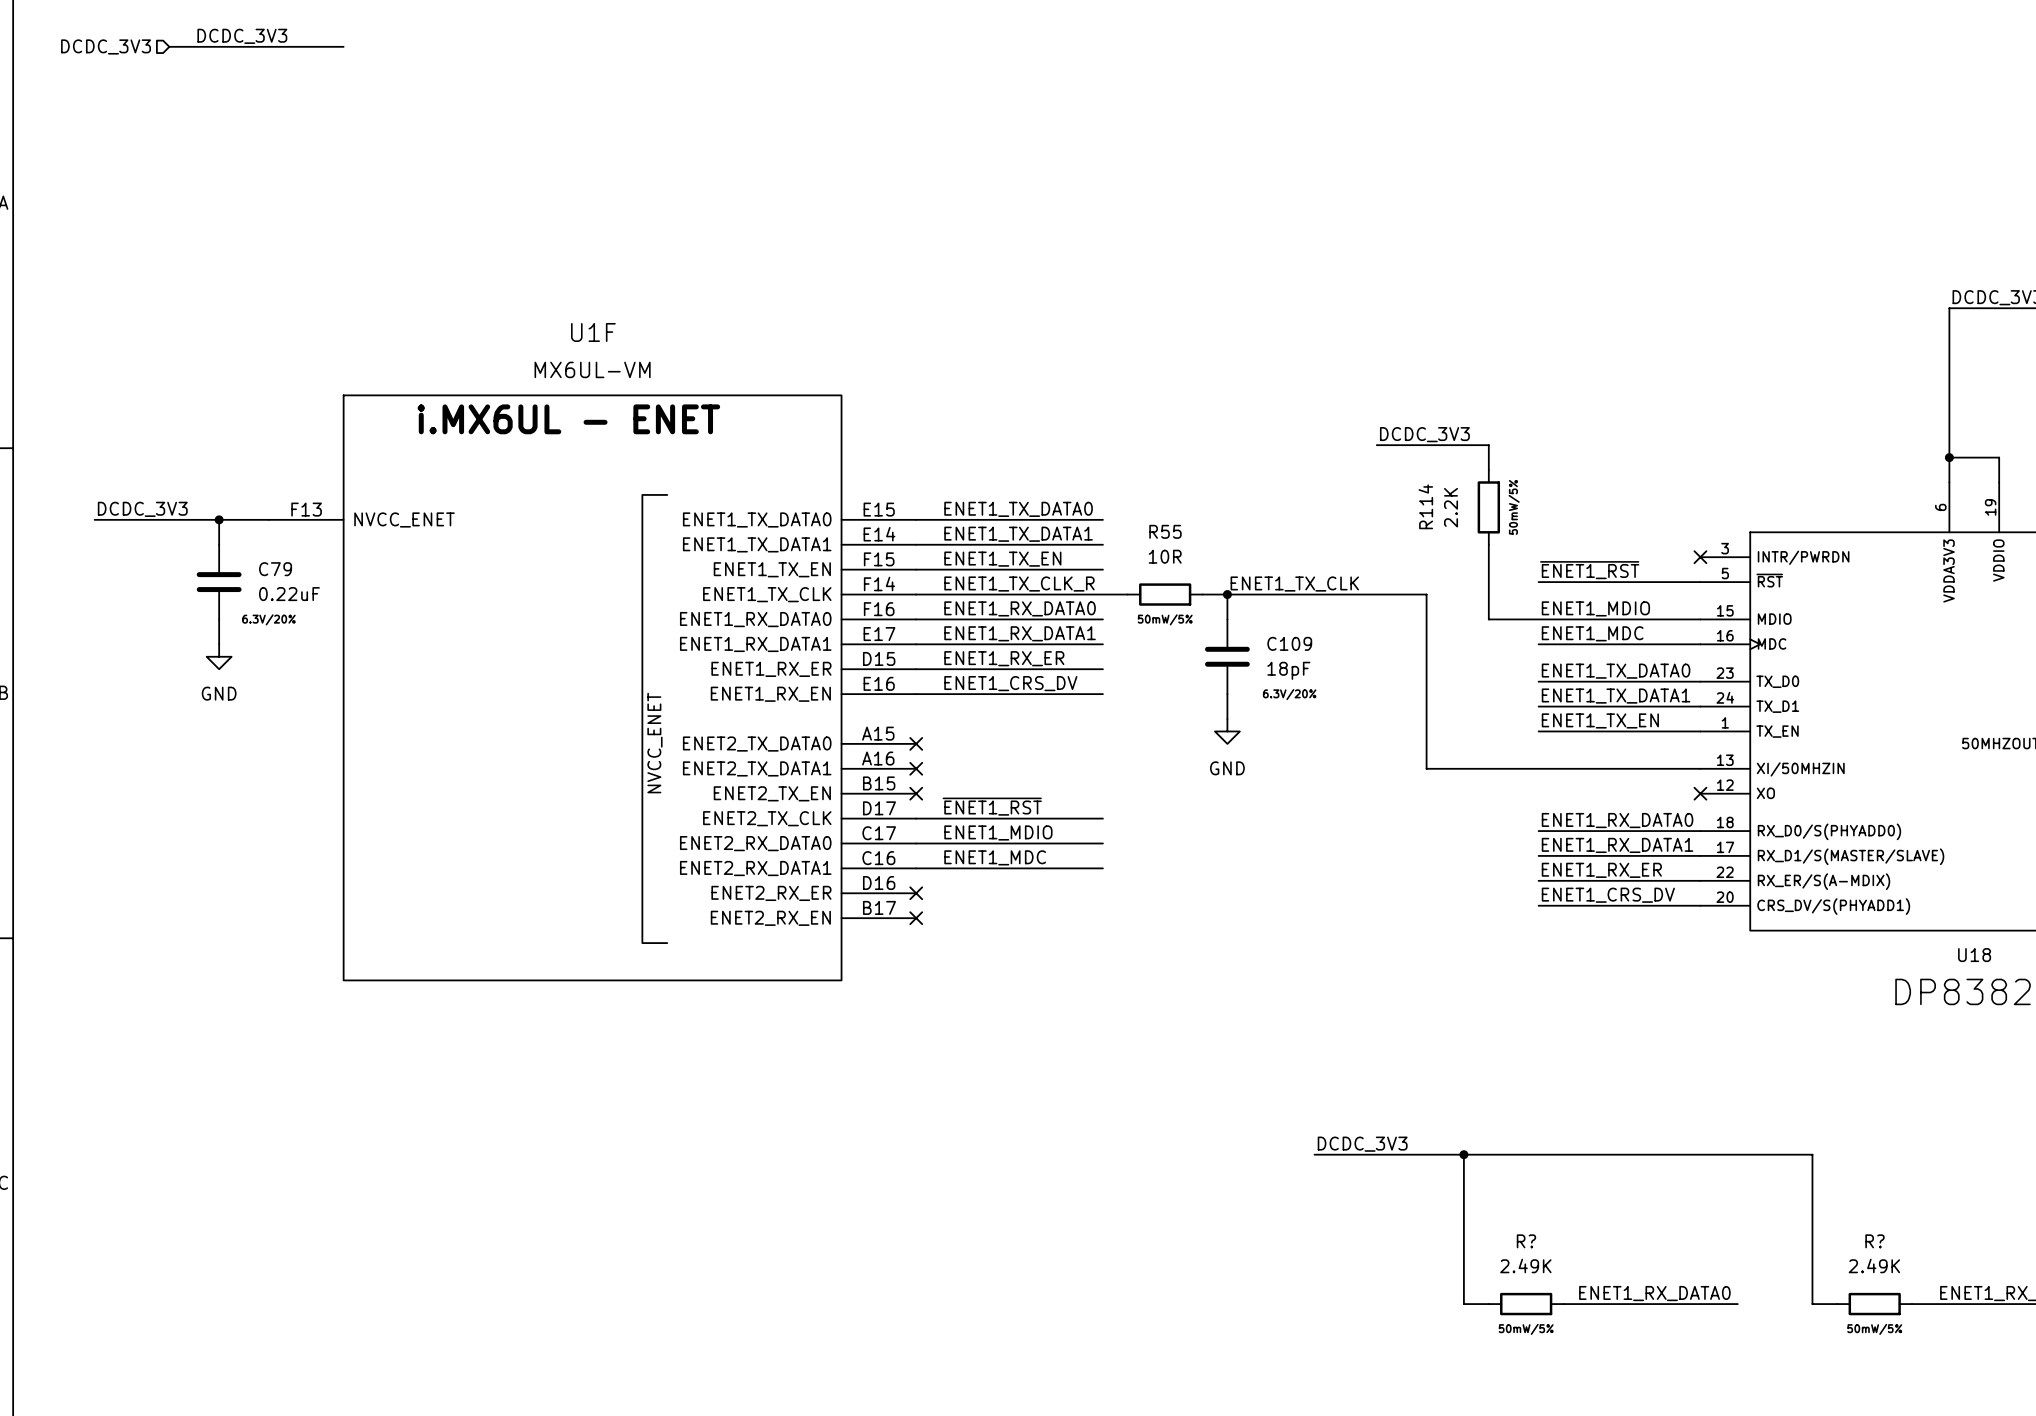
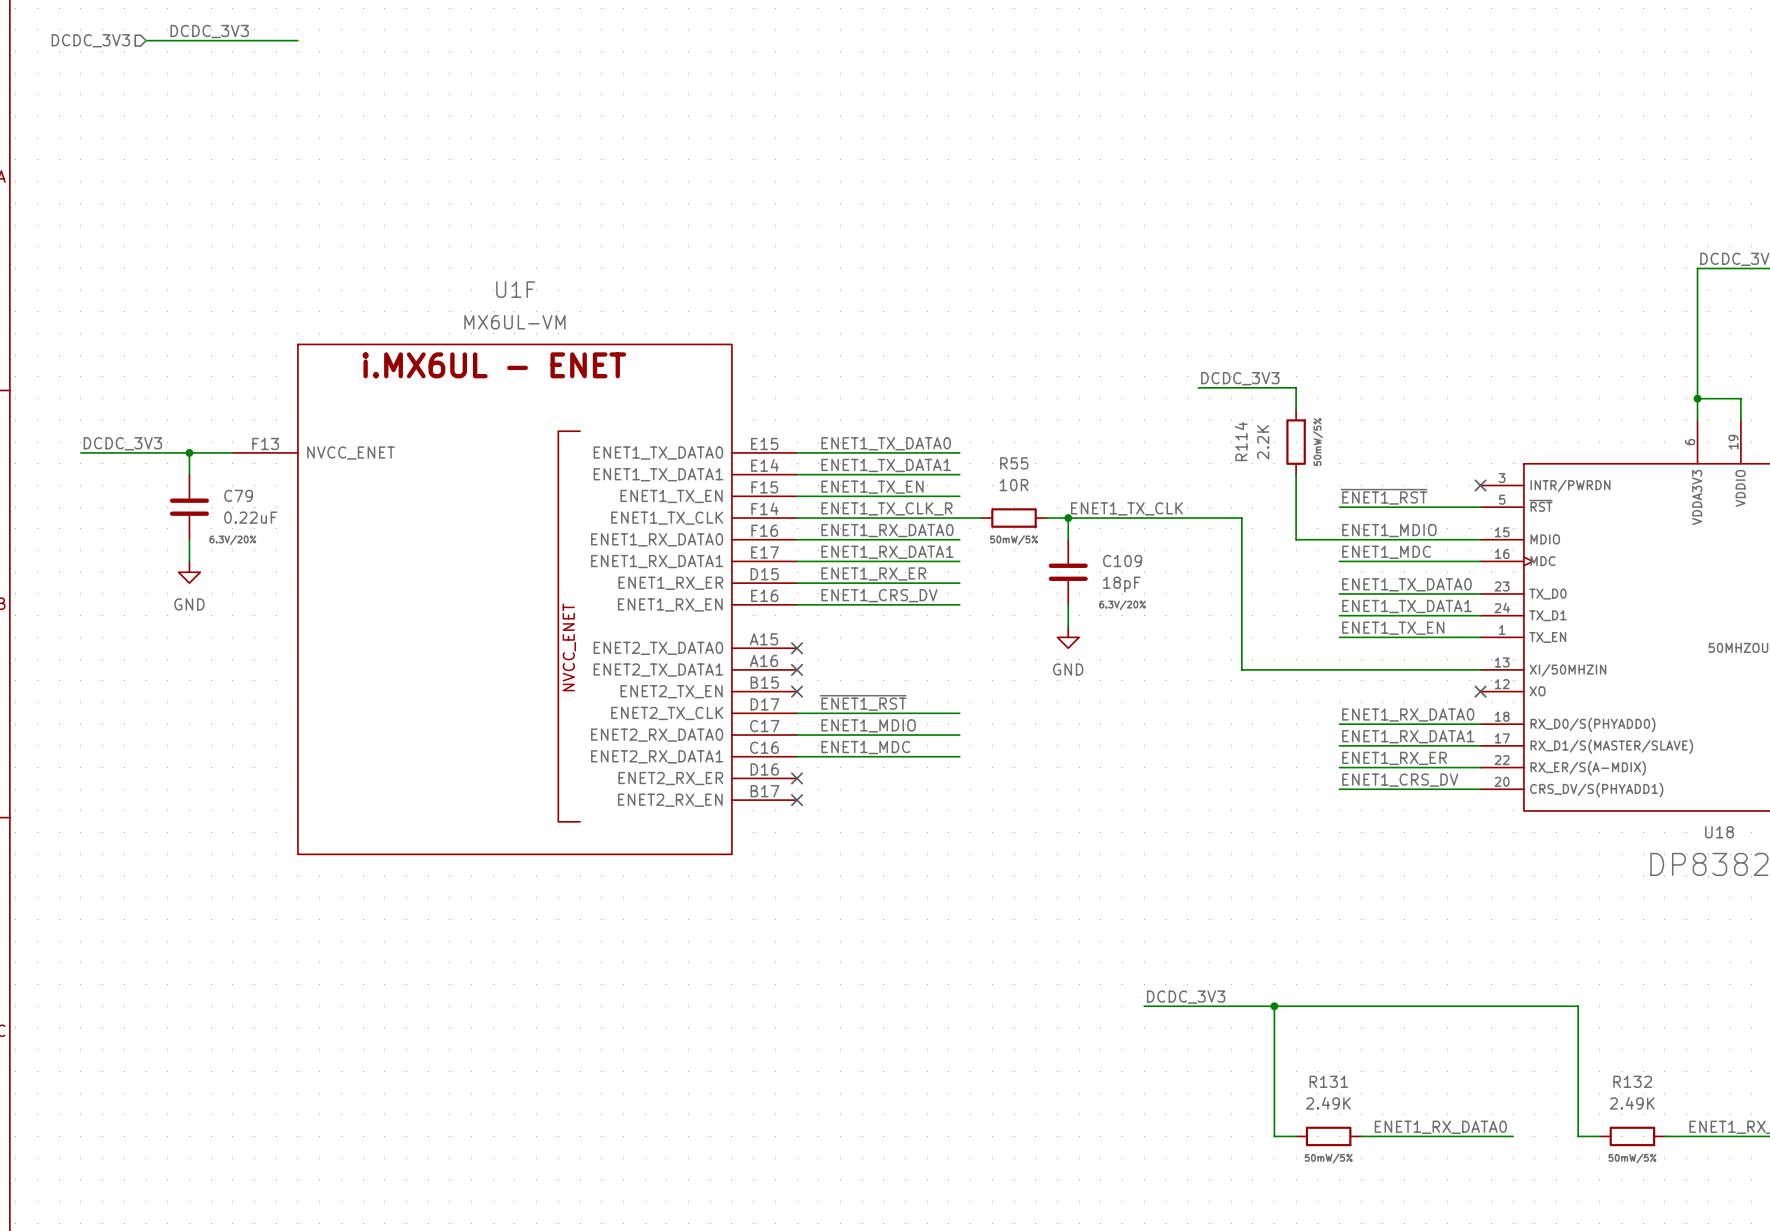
R? name: R? (1526, 1241) -> R131 (1328, 1081)
R? name: R? (1875, 1241) -> R132 (1632, 1081)

